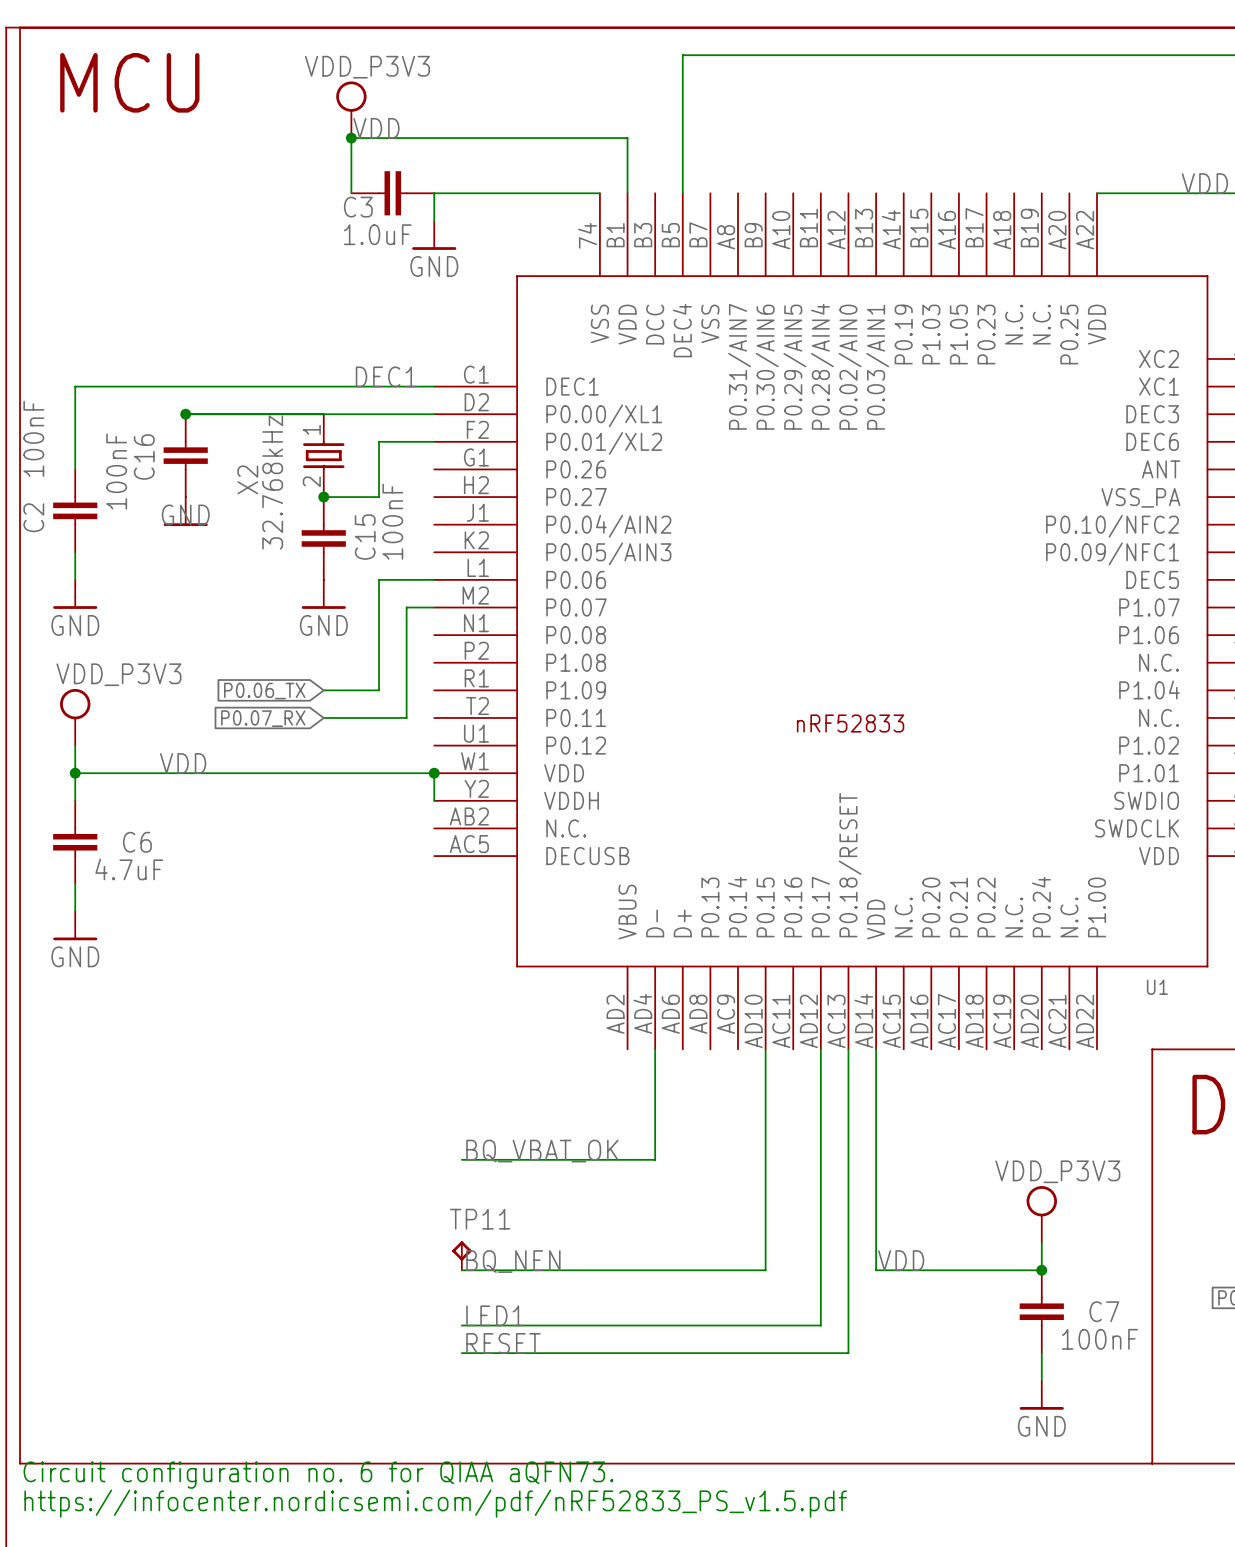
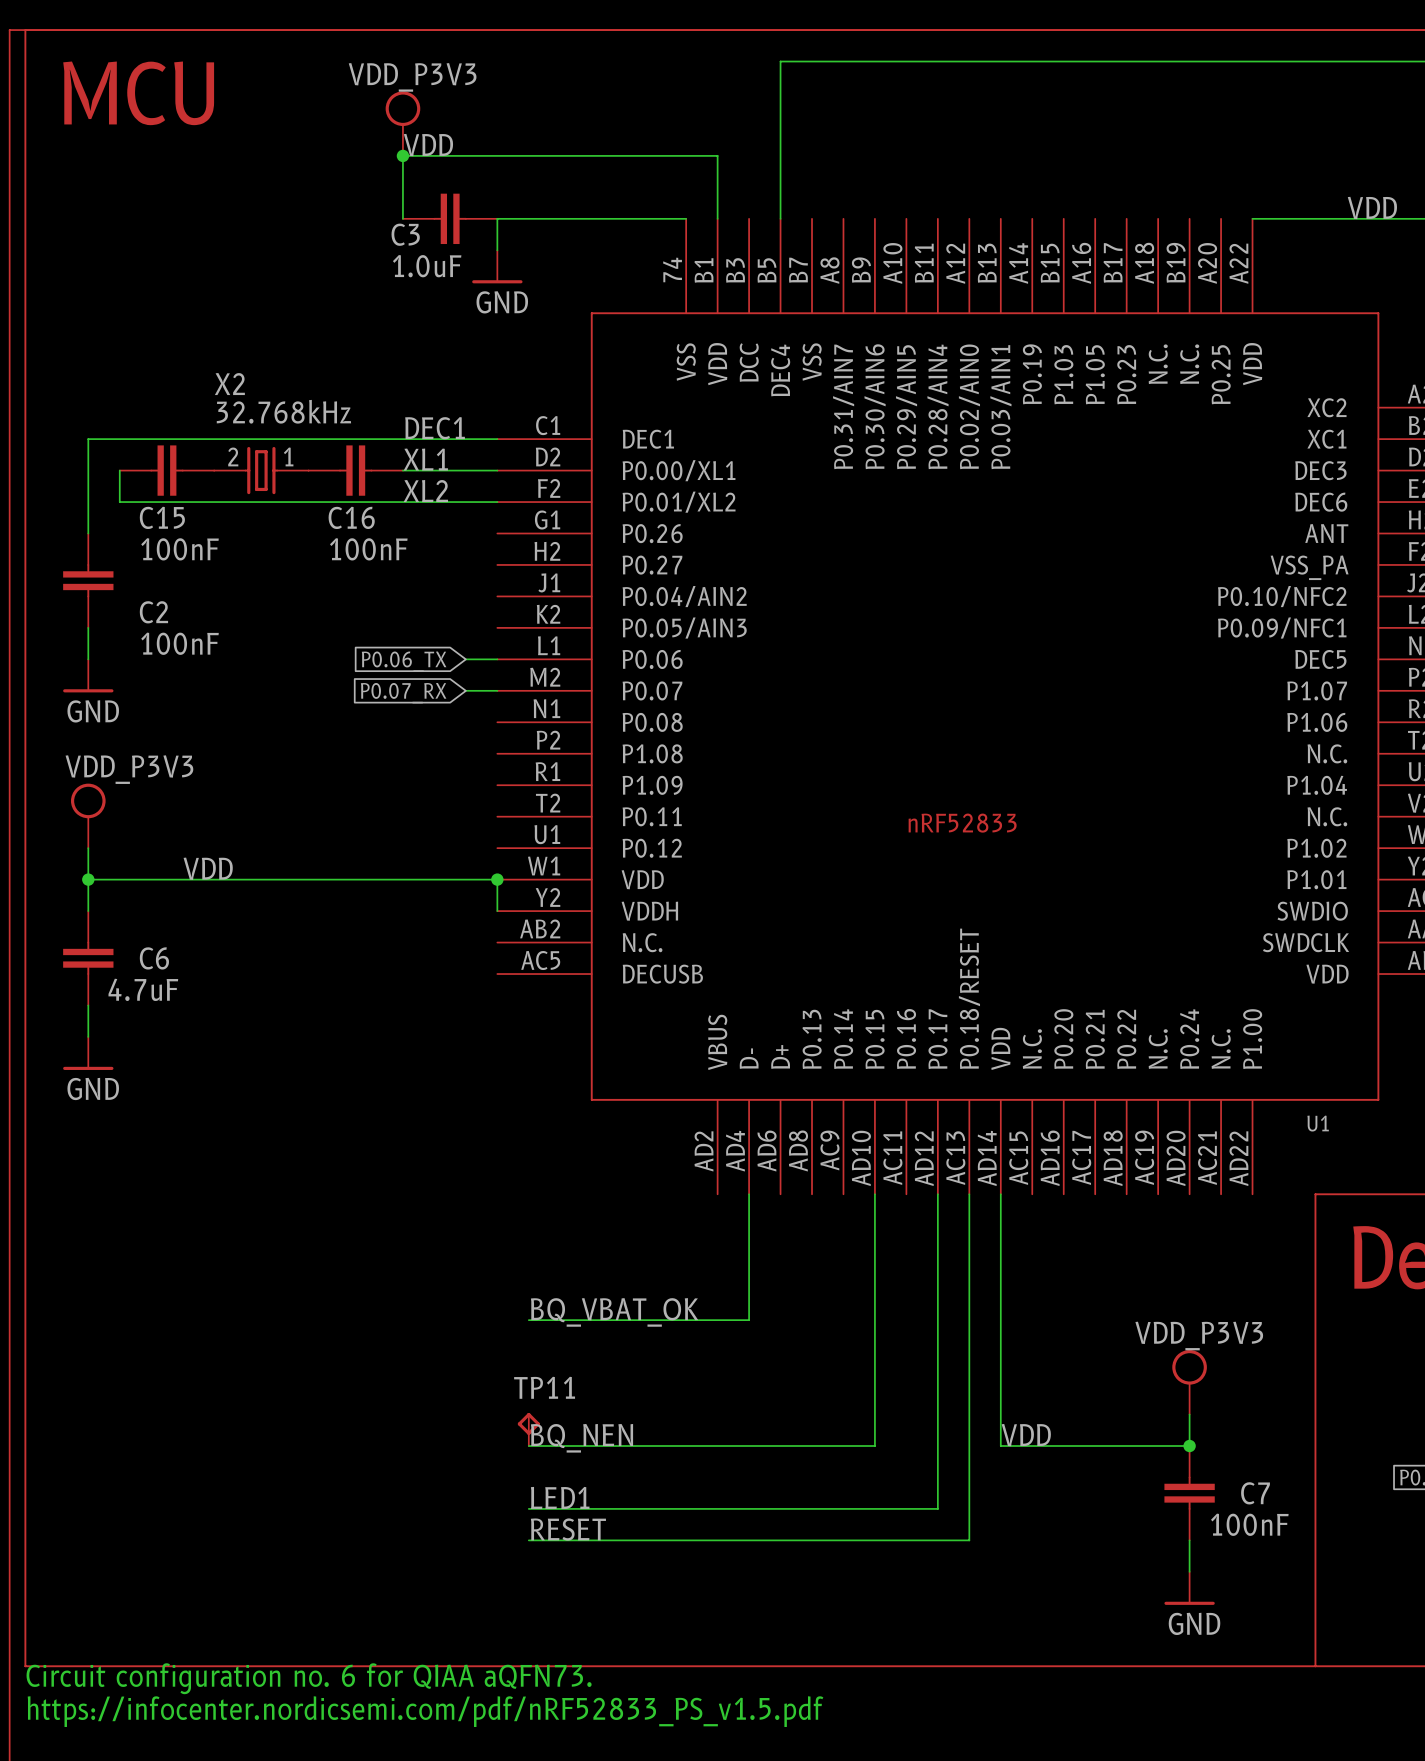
label: none -> XL1 (425, 459)
junction: (185, 414) -> none
label: none -> XL2 (425, 491)
C2 value rotation: 0° (33, 438) -> 90° clockwise (180, 643)
C2 value position: 100nF (33, 438) -> 100nF (180, 643)
wire: (379, 441) (379, 497) (323, 497) -> (434, 502) (119, 502) (119, 470)
C16 rotation: 0° (185, 455) -> 90° clockwise (355, 470)
C16 position: (185, 455) -> (355, 470)
X2 rotation: 0° (323, 455) -> 90° clockwise (261, 470)
X2 position: (323, 455) -> (261, 470)
C16 name position: C16 (144, 457) -> C16 (351, 517)
C16 value position: 100nF (116, 471) -> 100nF (368, 549)
X2 value position: 32.768kHz (272, 482) -> 32.768kHz (283, 411)
junction: (323, 497) -> none
power symbol: GND (185, 511) -> none
C2 name rotation: 0° (33, 517) -> 90° clockwise (153, 612)
C2 name position: C2 (33, 517) -> C2 (153, 612)
C15 rotation: 0° (323, 538) -> 90° clockwise (166, 470)
C15 position: (323, 538) -> (166, 470)
wire: (406, 579) (379, 579) (379, 690) (323, 690) -> none
power symbol: GND (323, 594) -> none
wire: (406, 607) (406, 717) (323, 717) -> none
global label position: P0.06_TX (264, 691) -> P0.06_TX (404, 661)
global label position: P0.07_RX (263, 718) -> P0.07_RX (403, 693)

